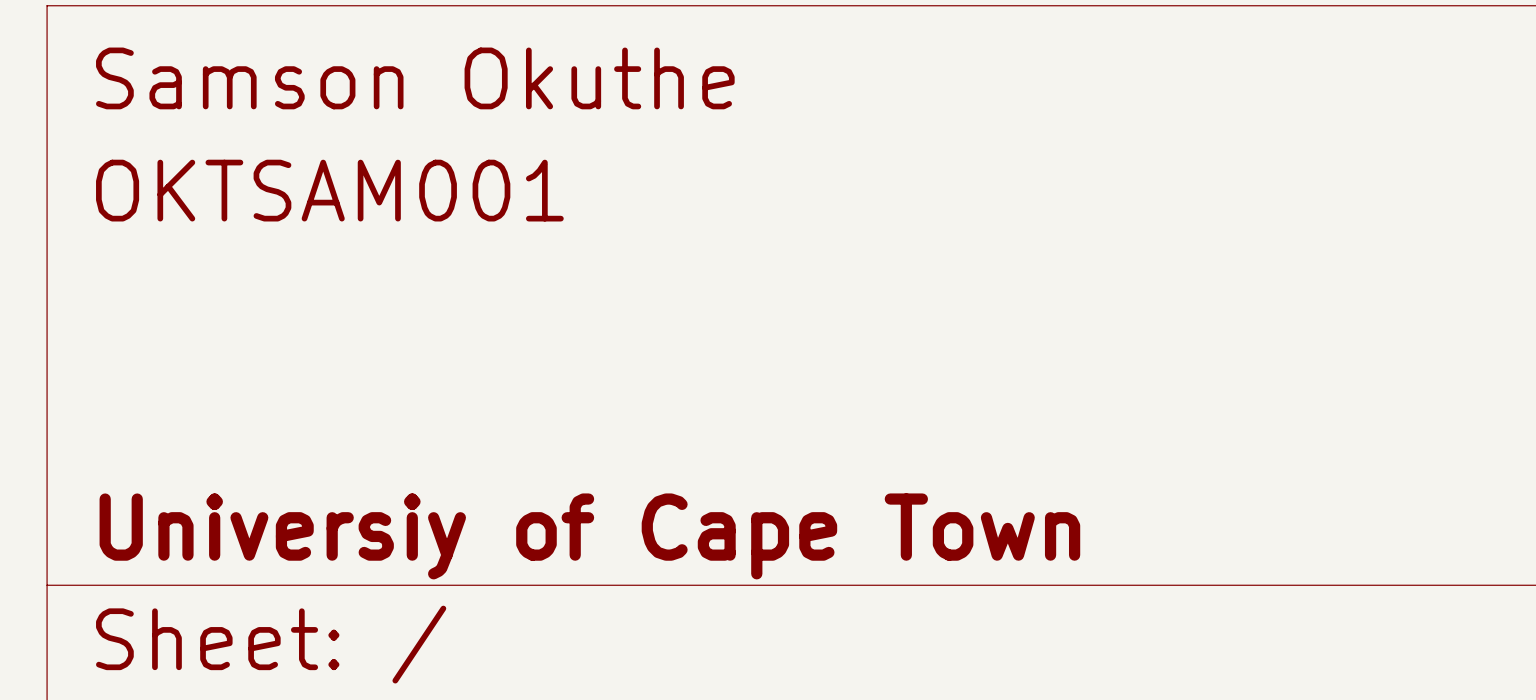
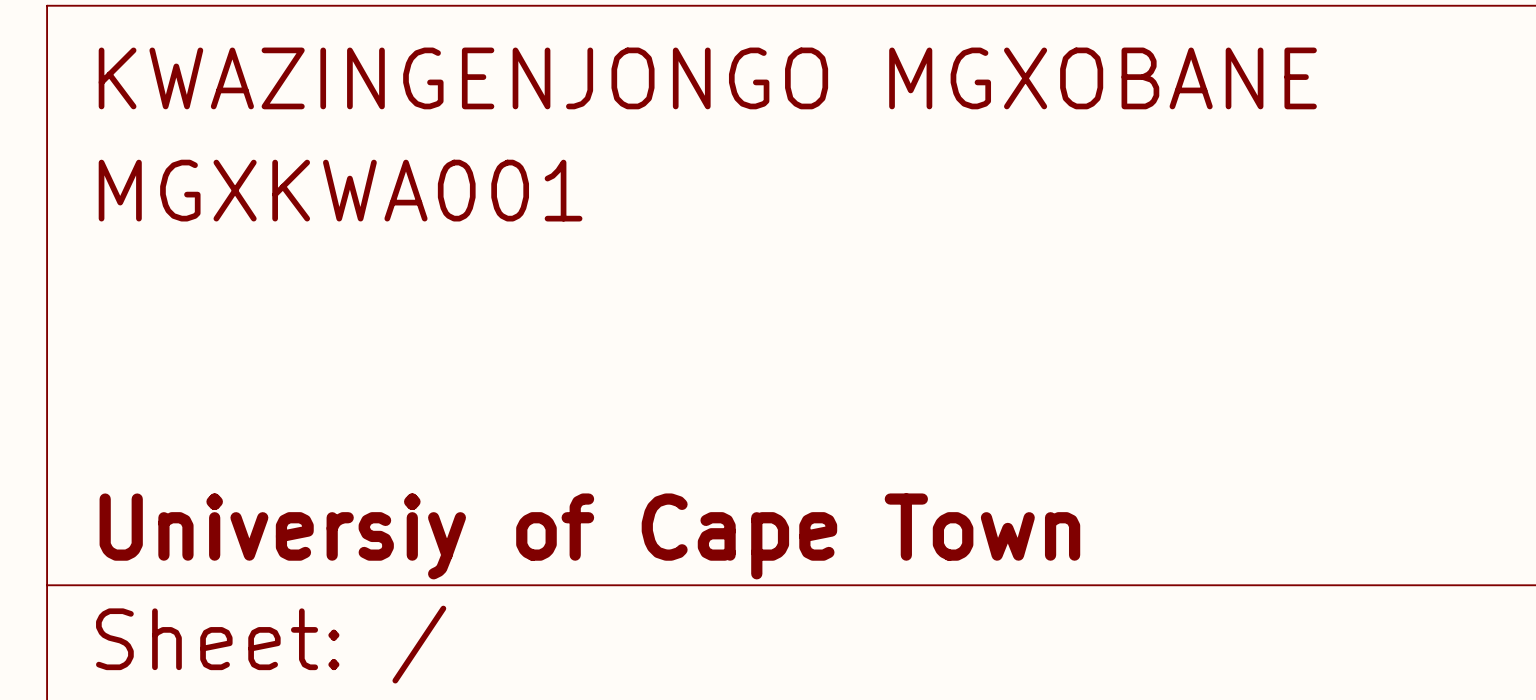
title block: Samson Okuthe (415, 78) -> KWAZINGENJONGO MGXOBANE (707, 78)
title block: OKTSAM001 (329, 190) -> MGXKWA001 (340, 190)

